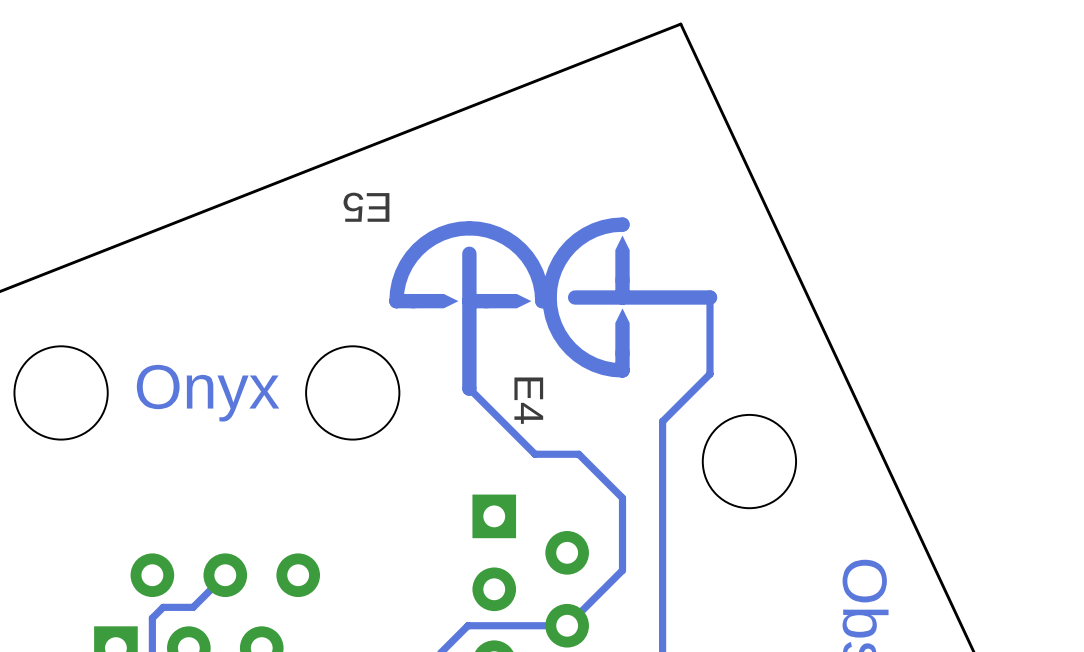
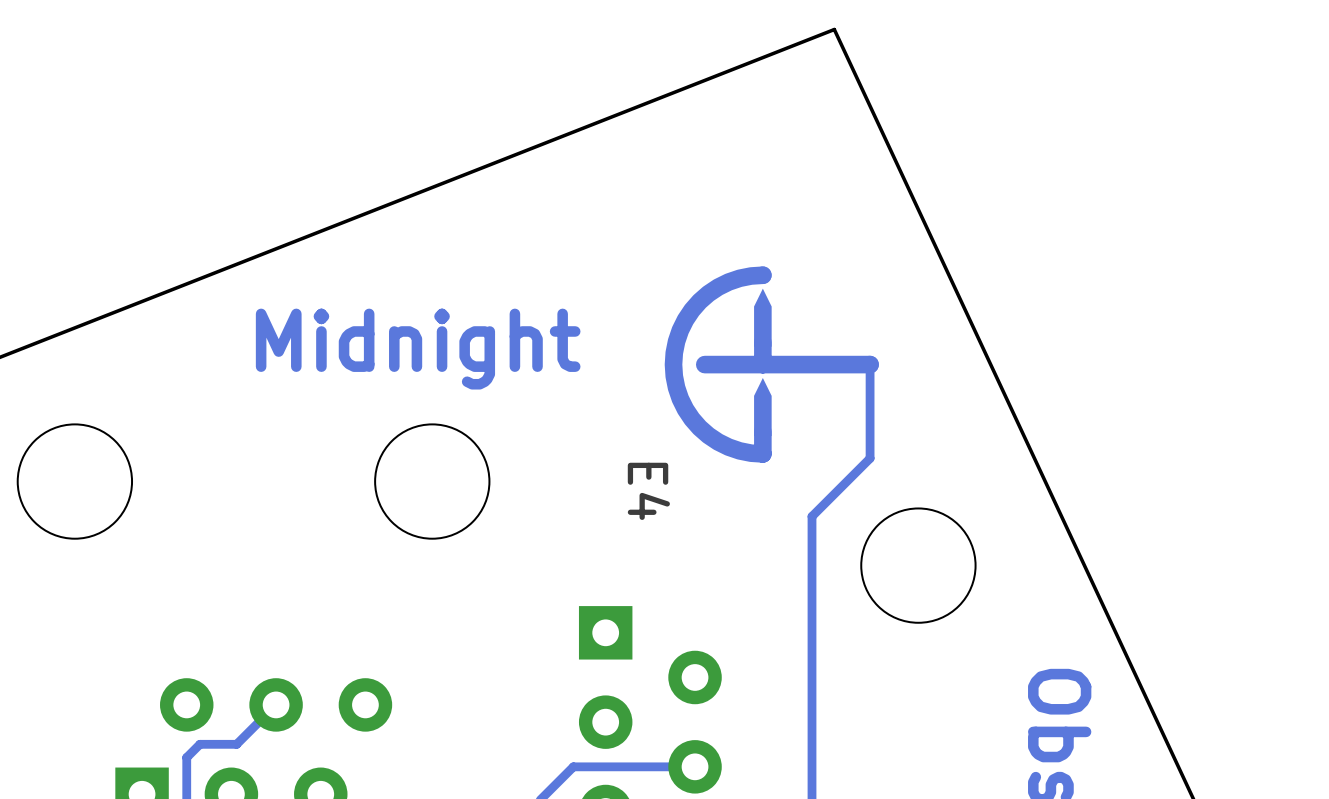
E4 footprint: [542, 217, 718, 378] -> [664, 266, 879, 463]
text: none -> Midnight (418, 349)
E5: (469, 308) -> none
track: (469, 388) (535, 454) (578, 454) (622, 498) (622, 570) (567, 625) -> none
text: Onyx (208, 393) -> none

